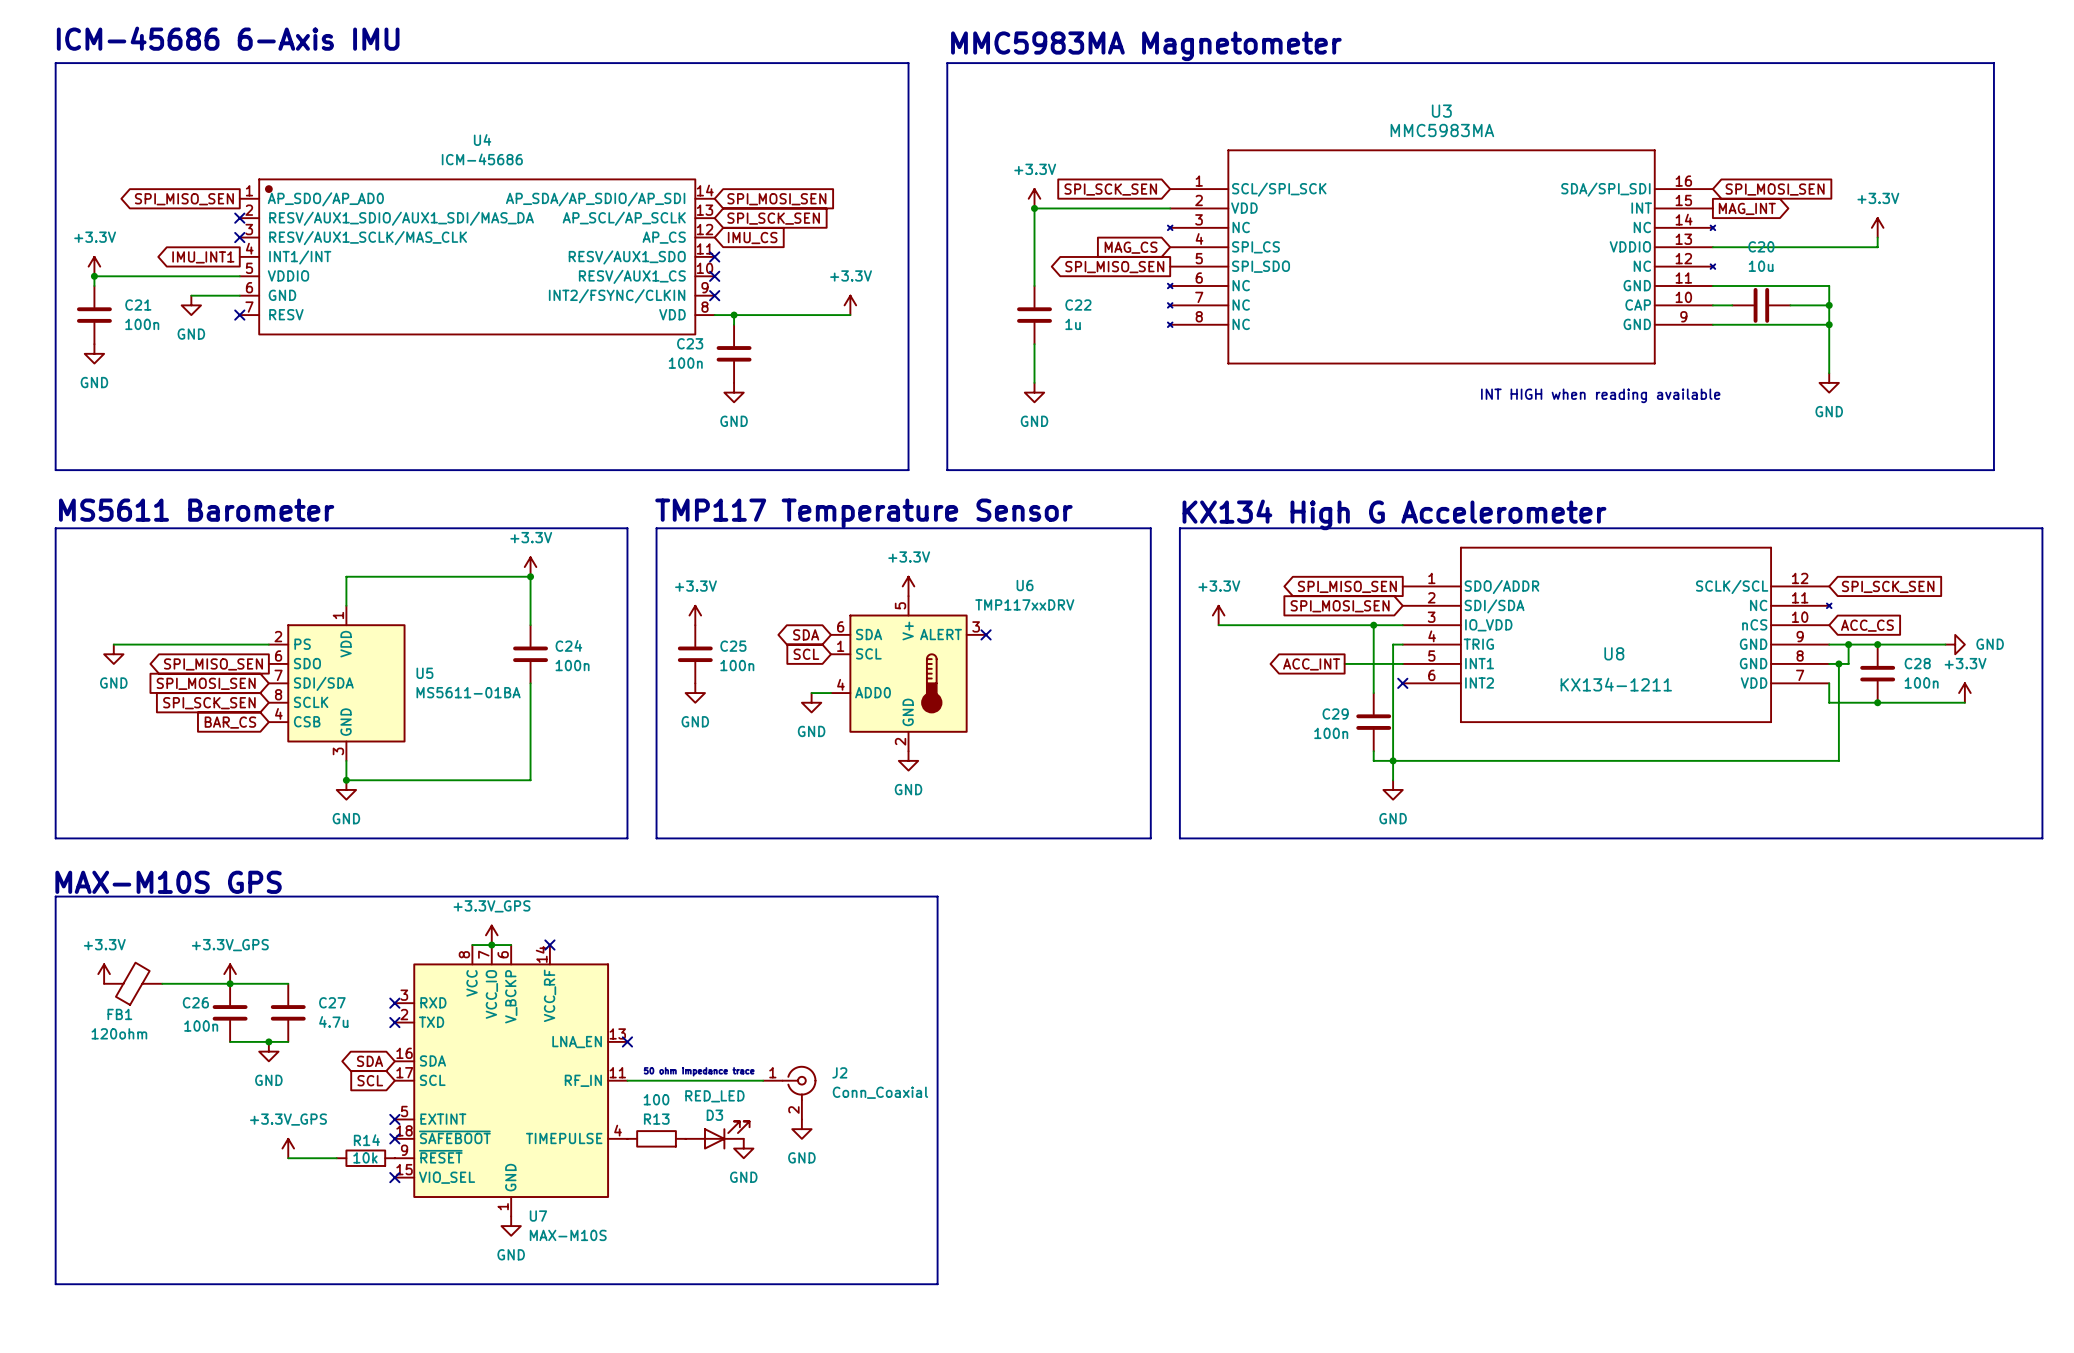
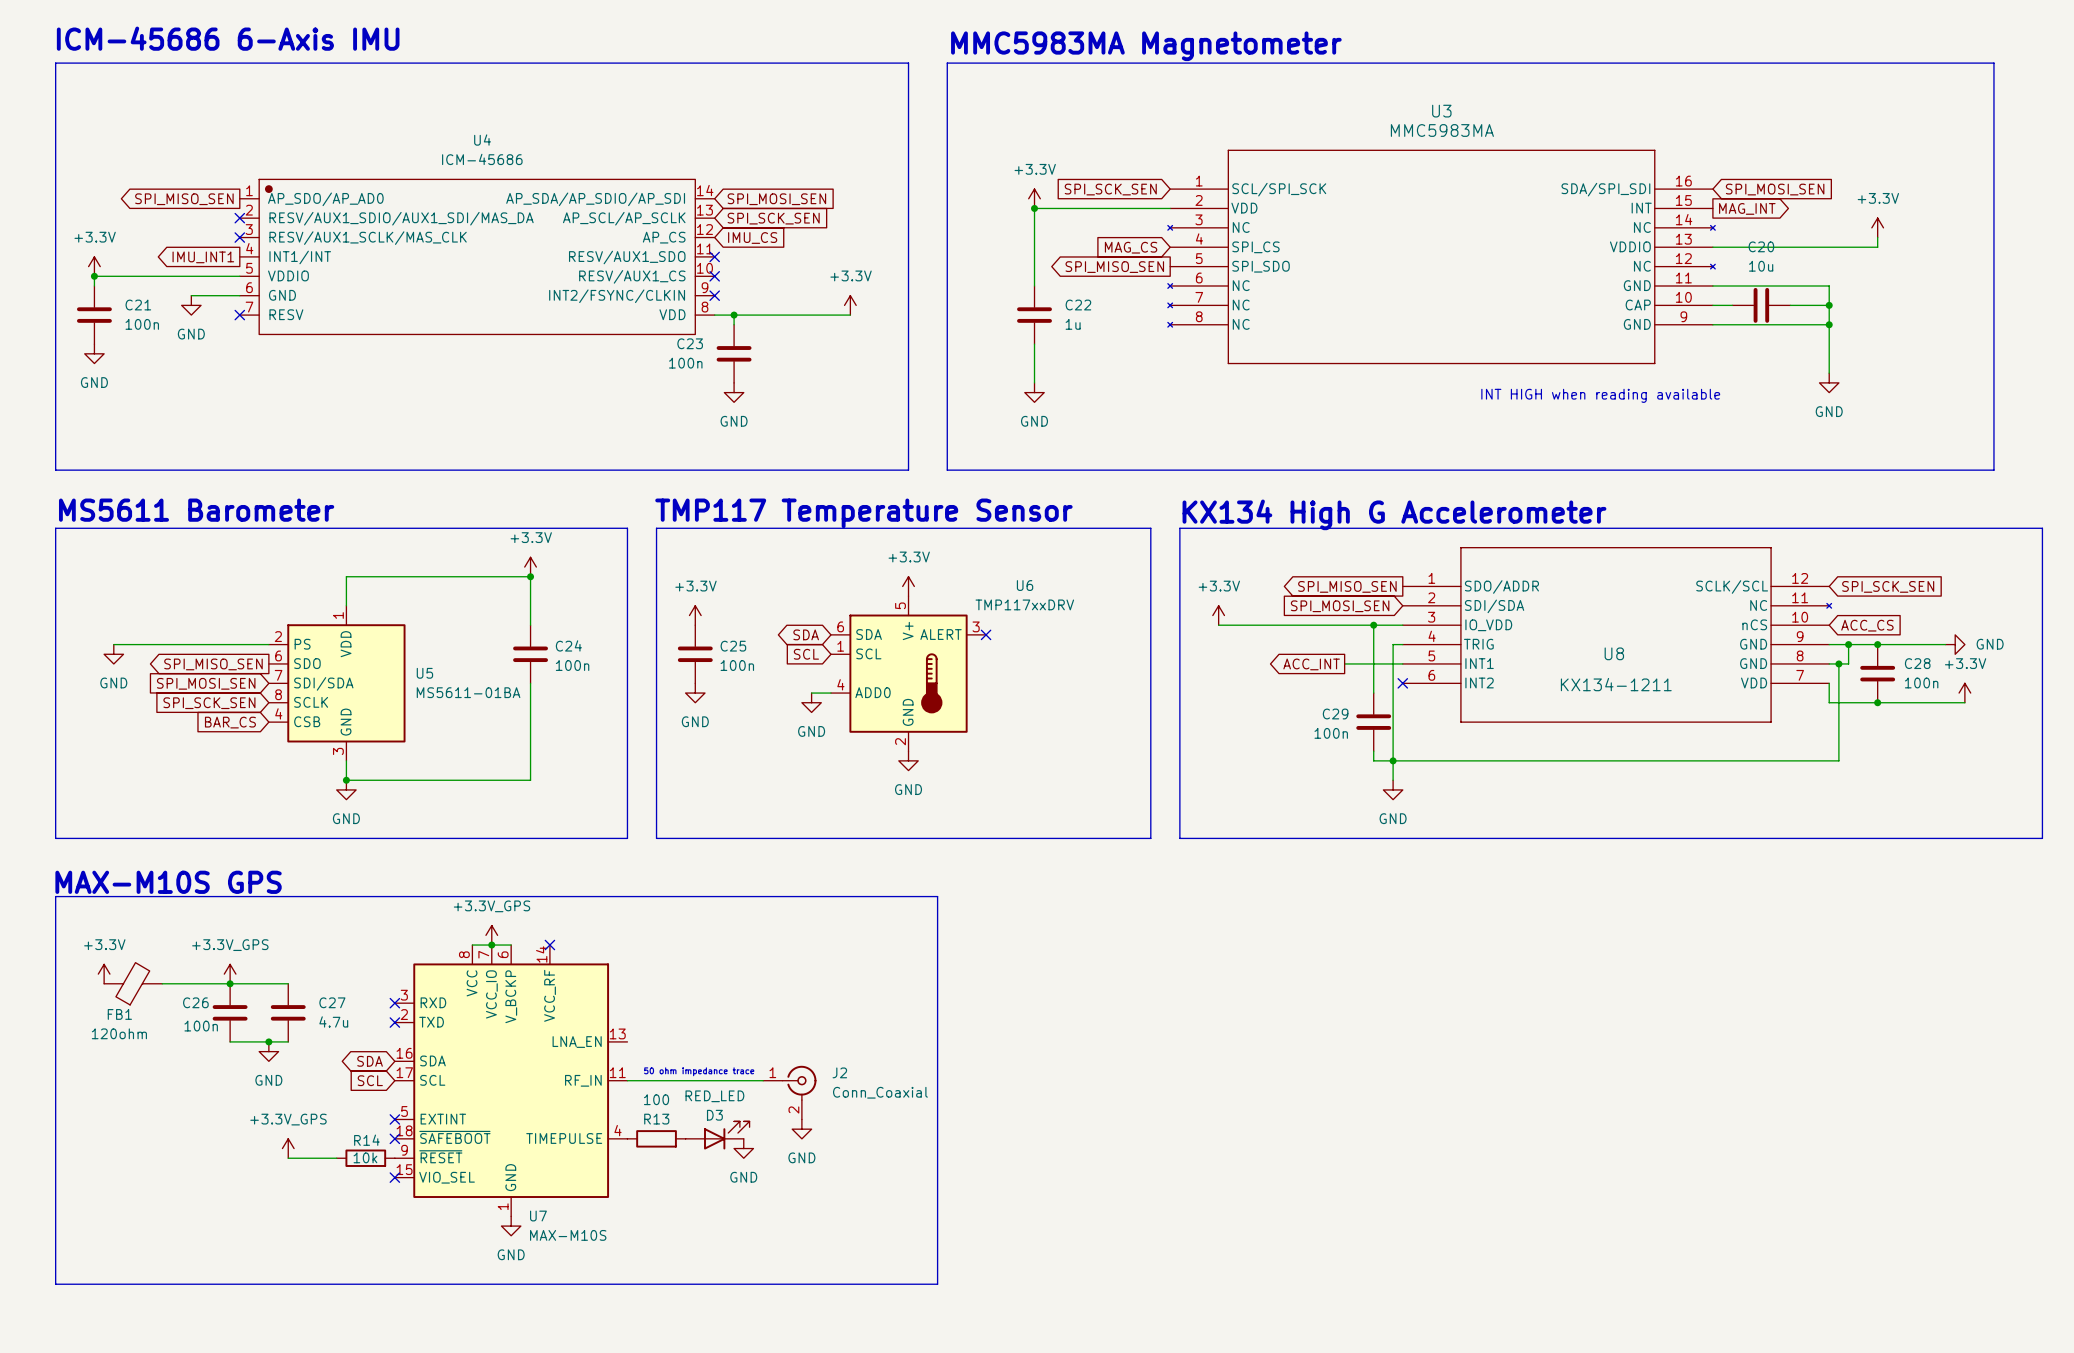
no-connect mark: (627, 1041) -> none

